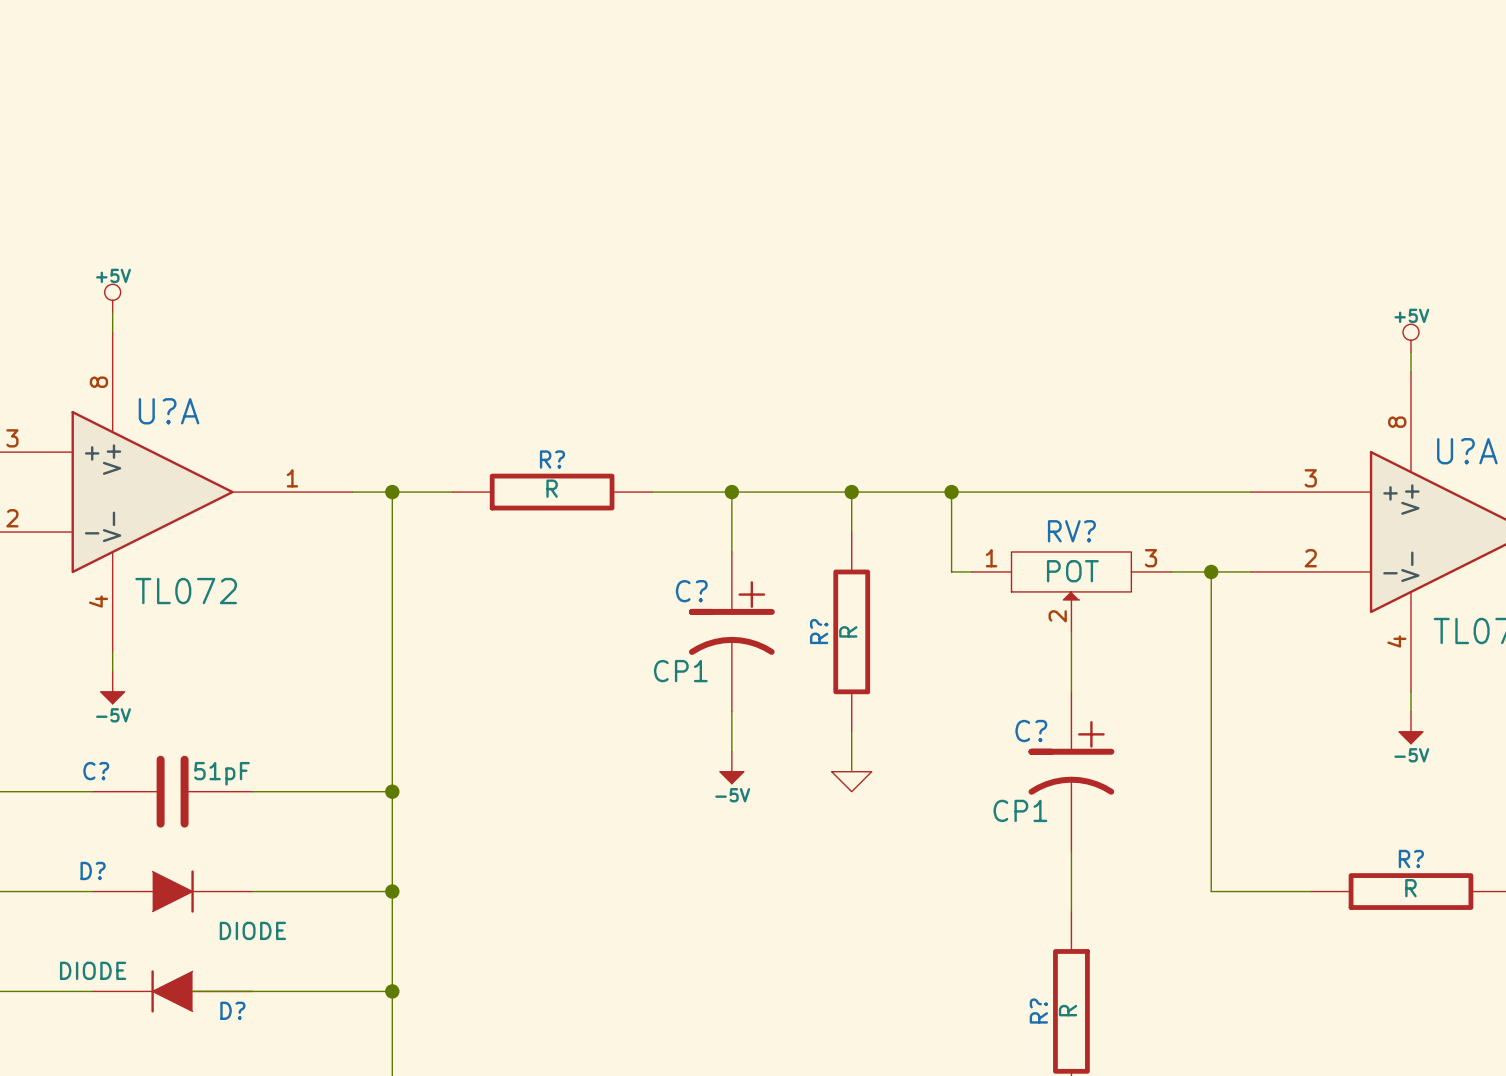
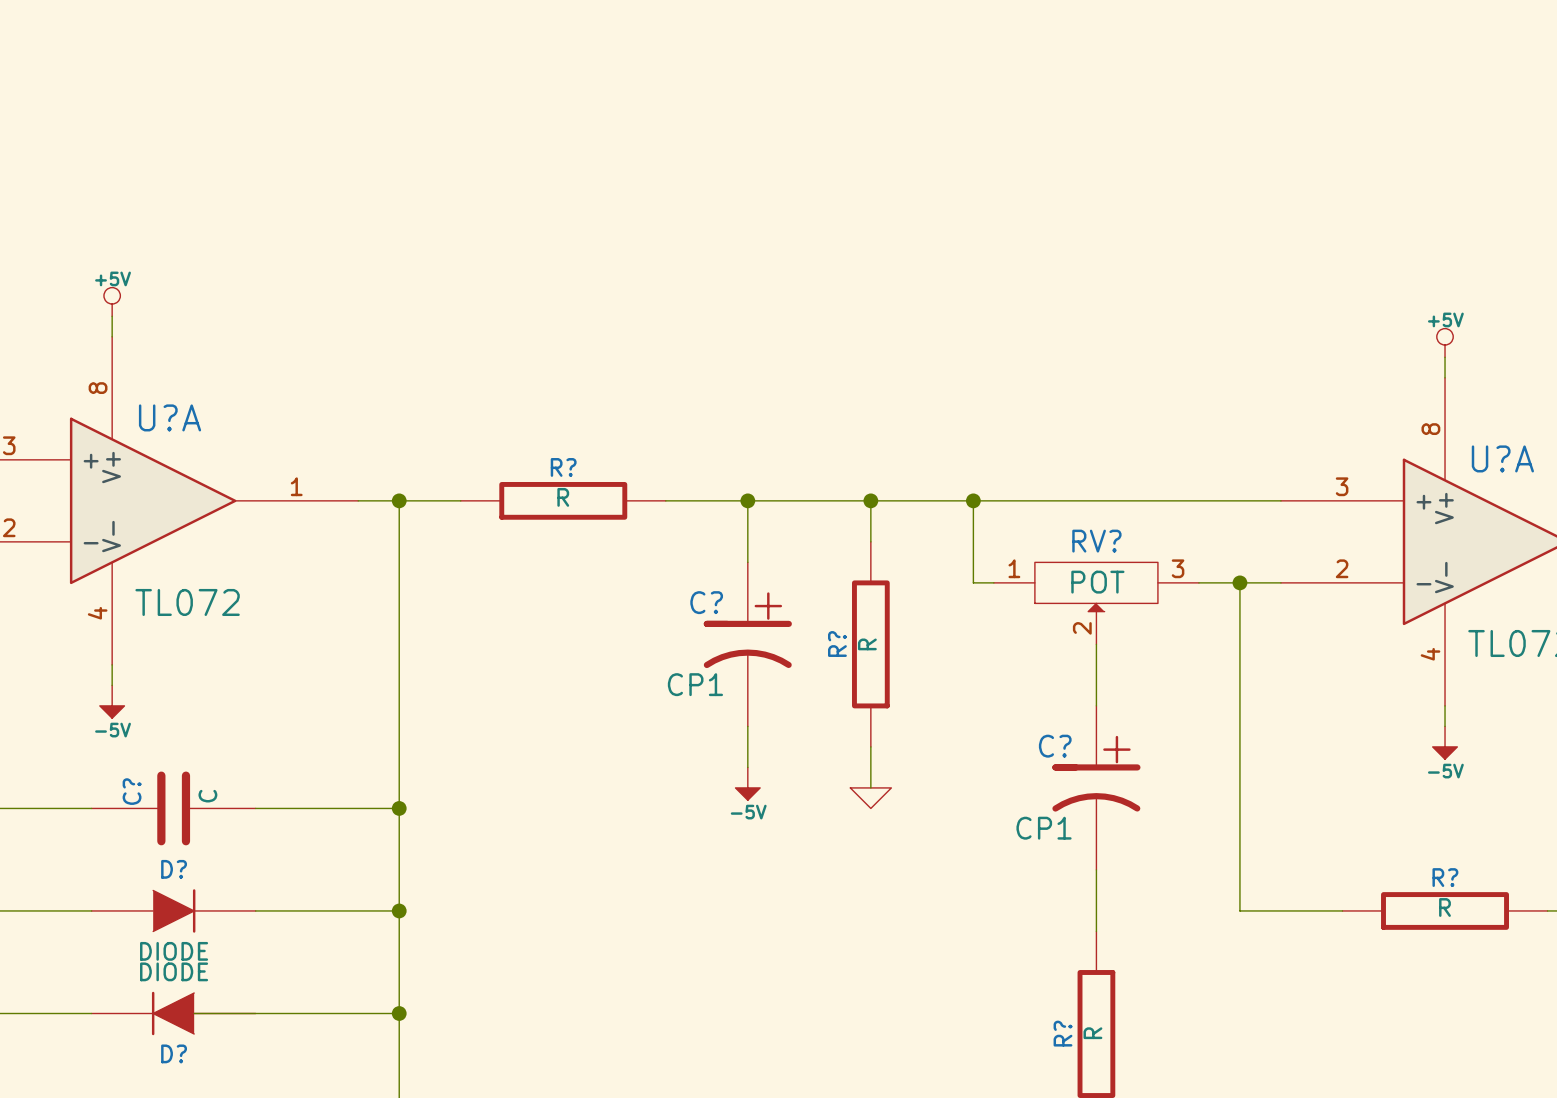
C? name rotation: 0° (96, 771) -> 90° counterclockwise (132, 791)
C? name position: C? (96, 771) -> C? (132, 791)
C? value: 51pF (222, 773) -> C (207, 796)
D? name position: D? (93, 870) -> D? (174, 869)
D? value position: DIODE (252, 930) -> DIODE (174, 951)
D? value position: DIODE (93, 970) -> DIODE (174, 971)
D? name position: D? (232, 1010) -> D? (174, 1053)

